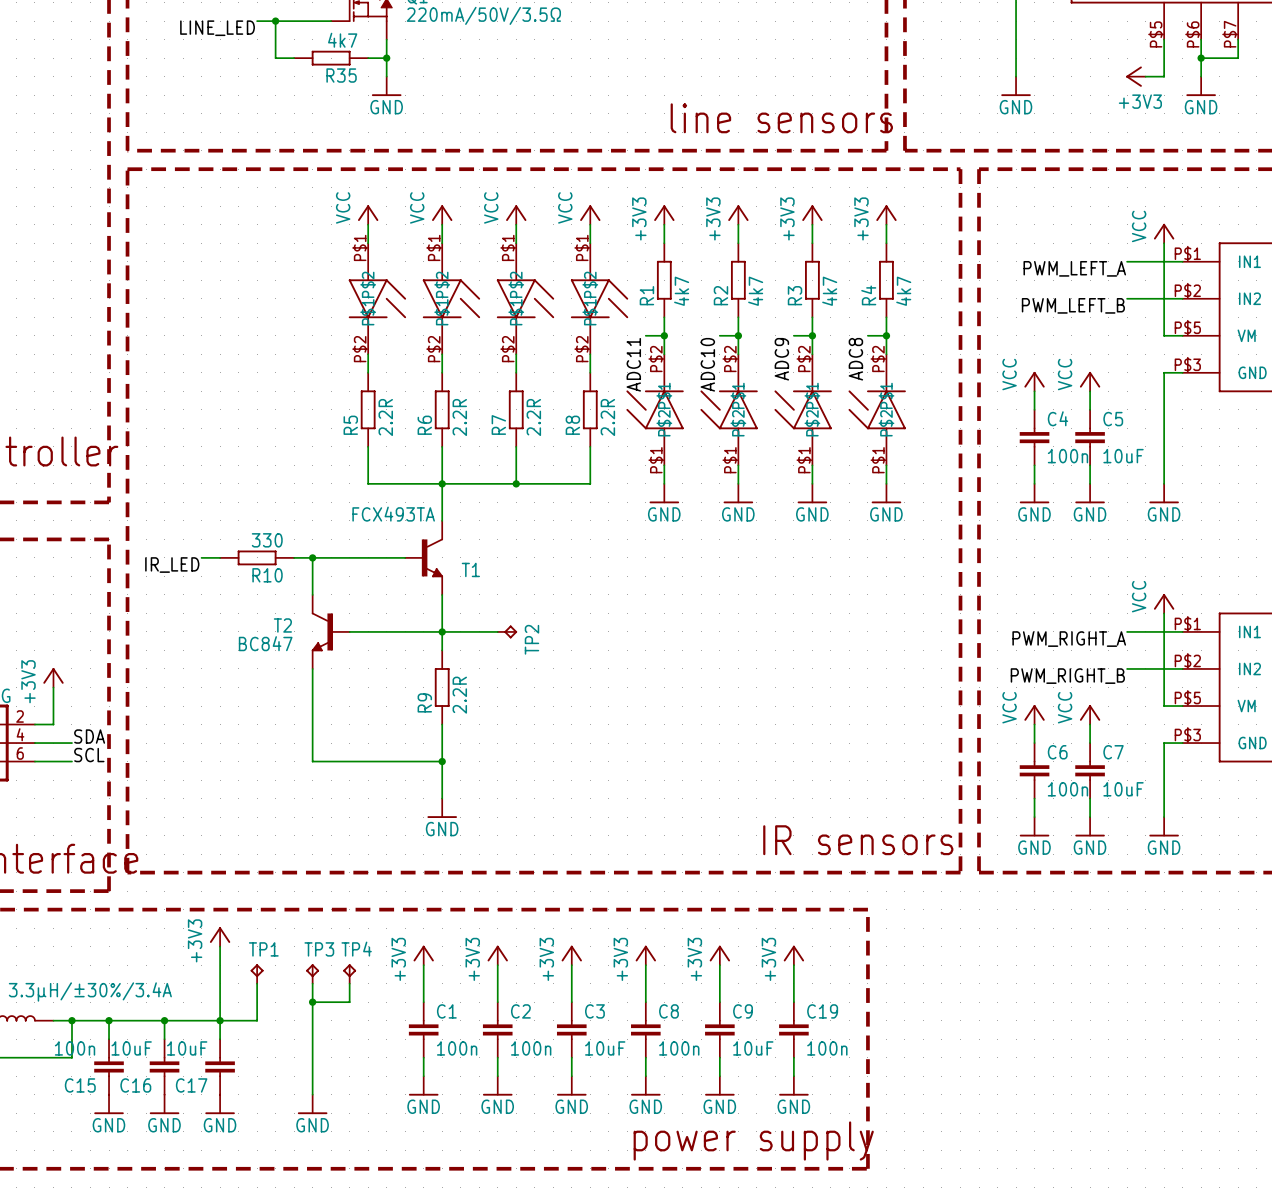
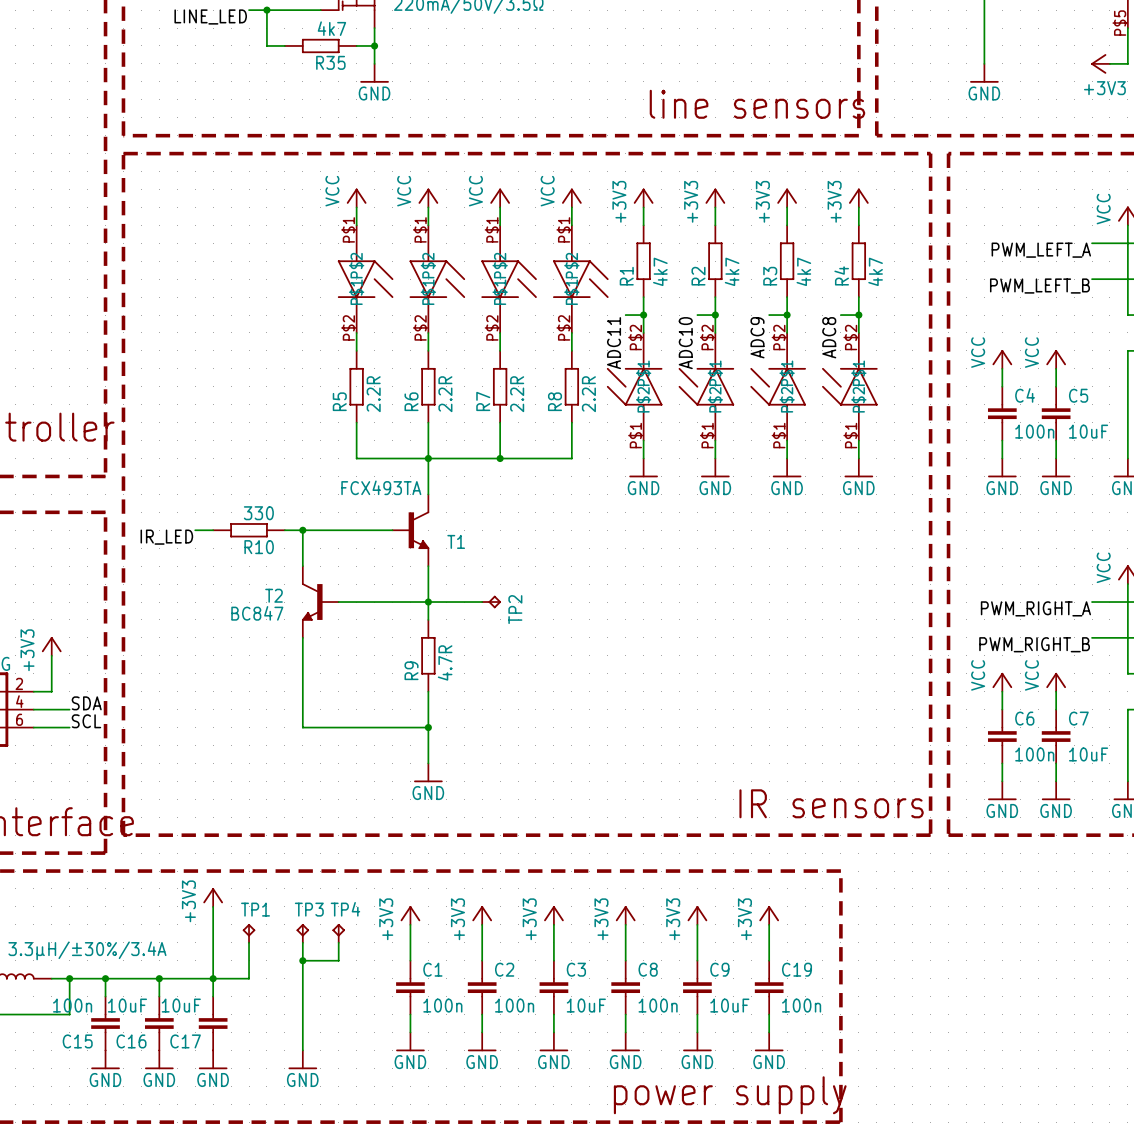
R9 value: 2.2R (459, 695) -> 4.7R (445, 662)

